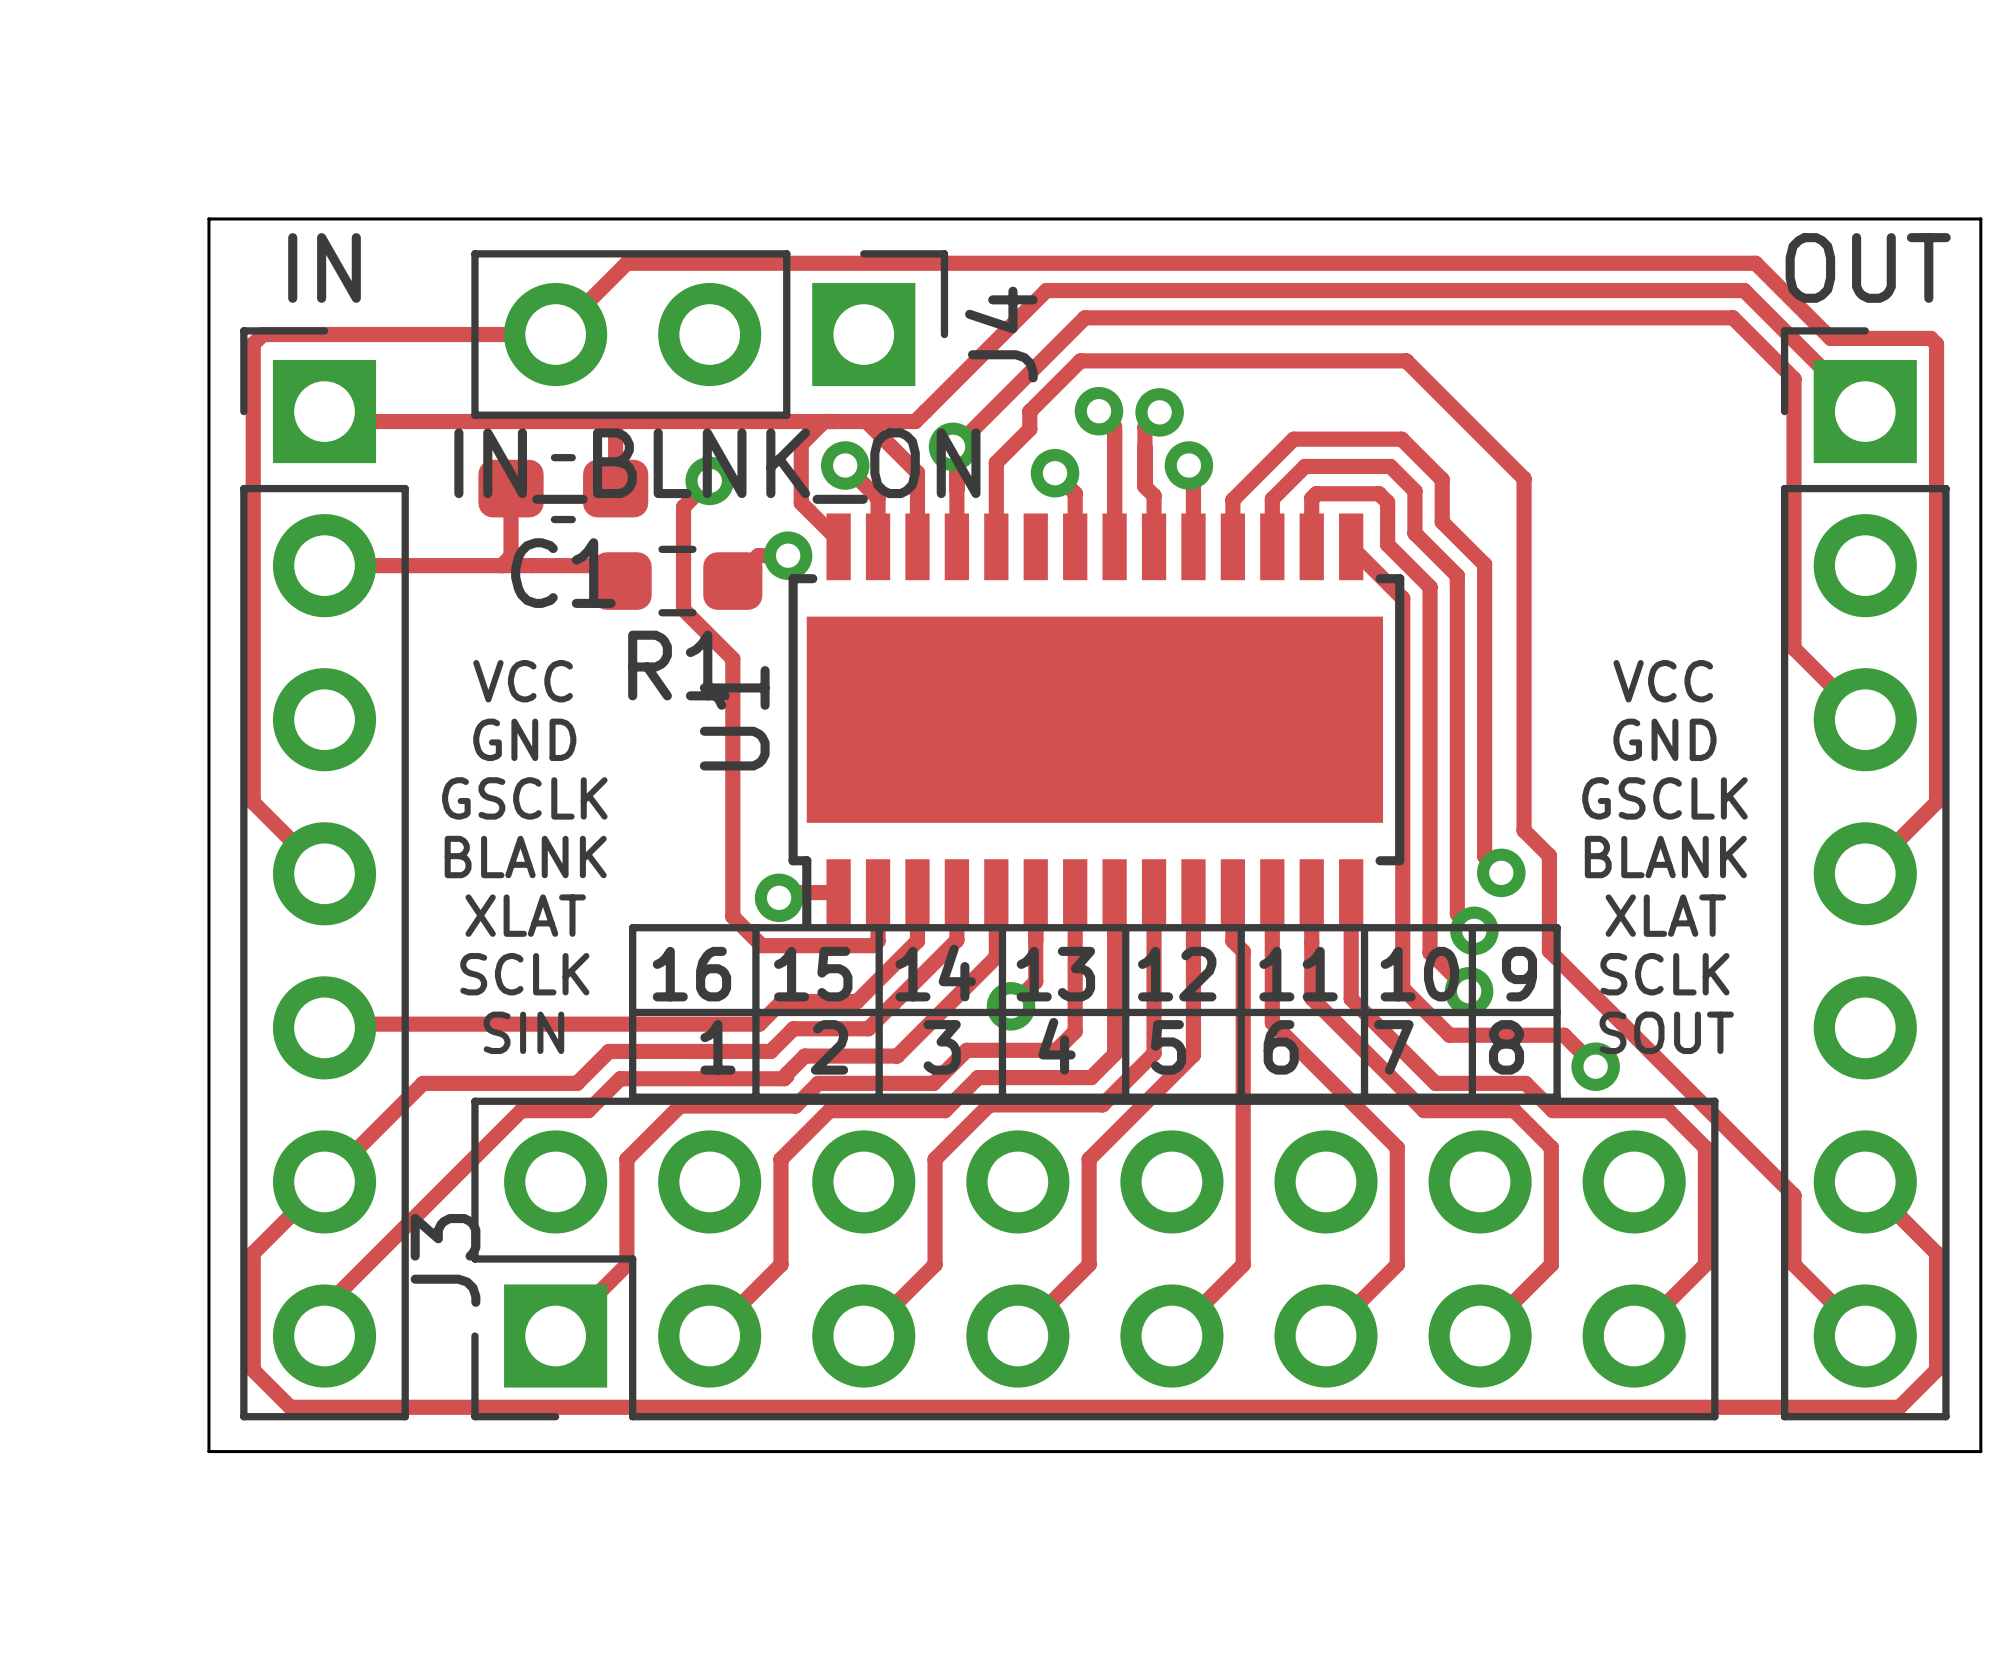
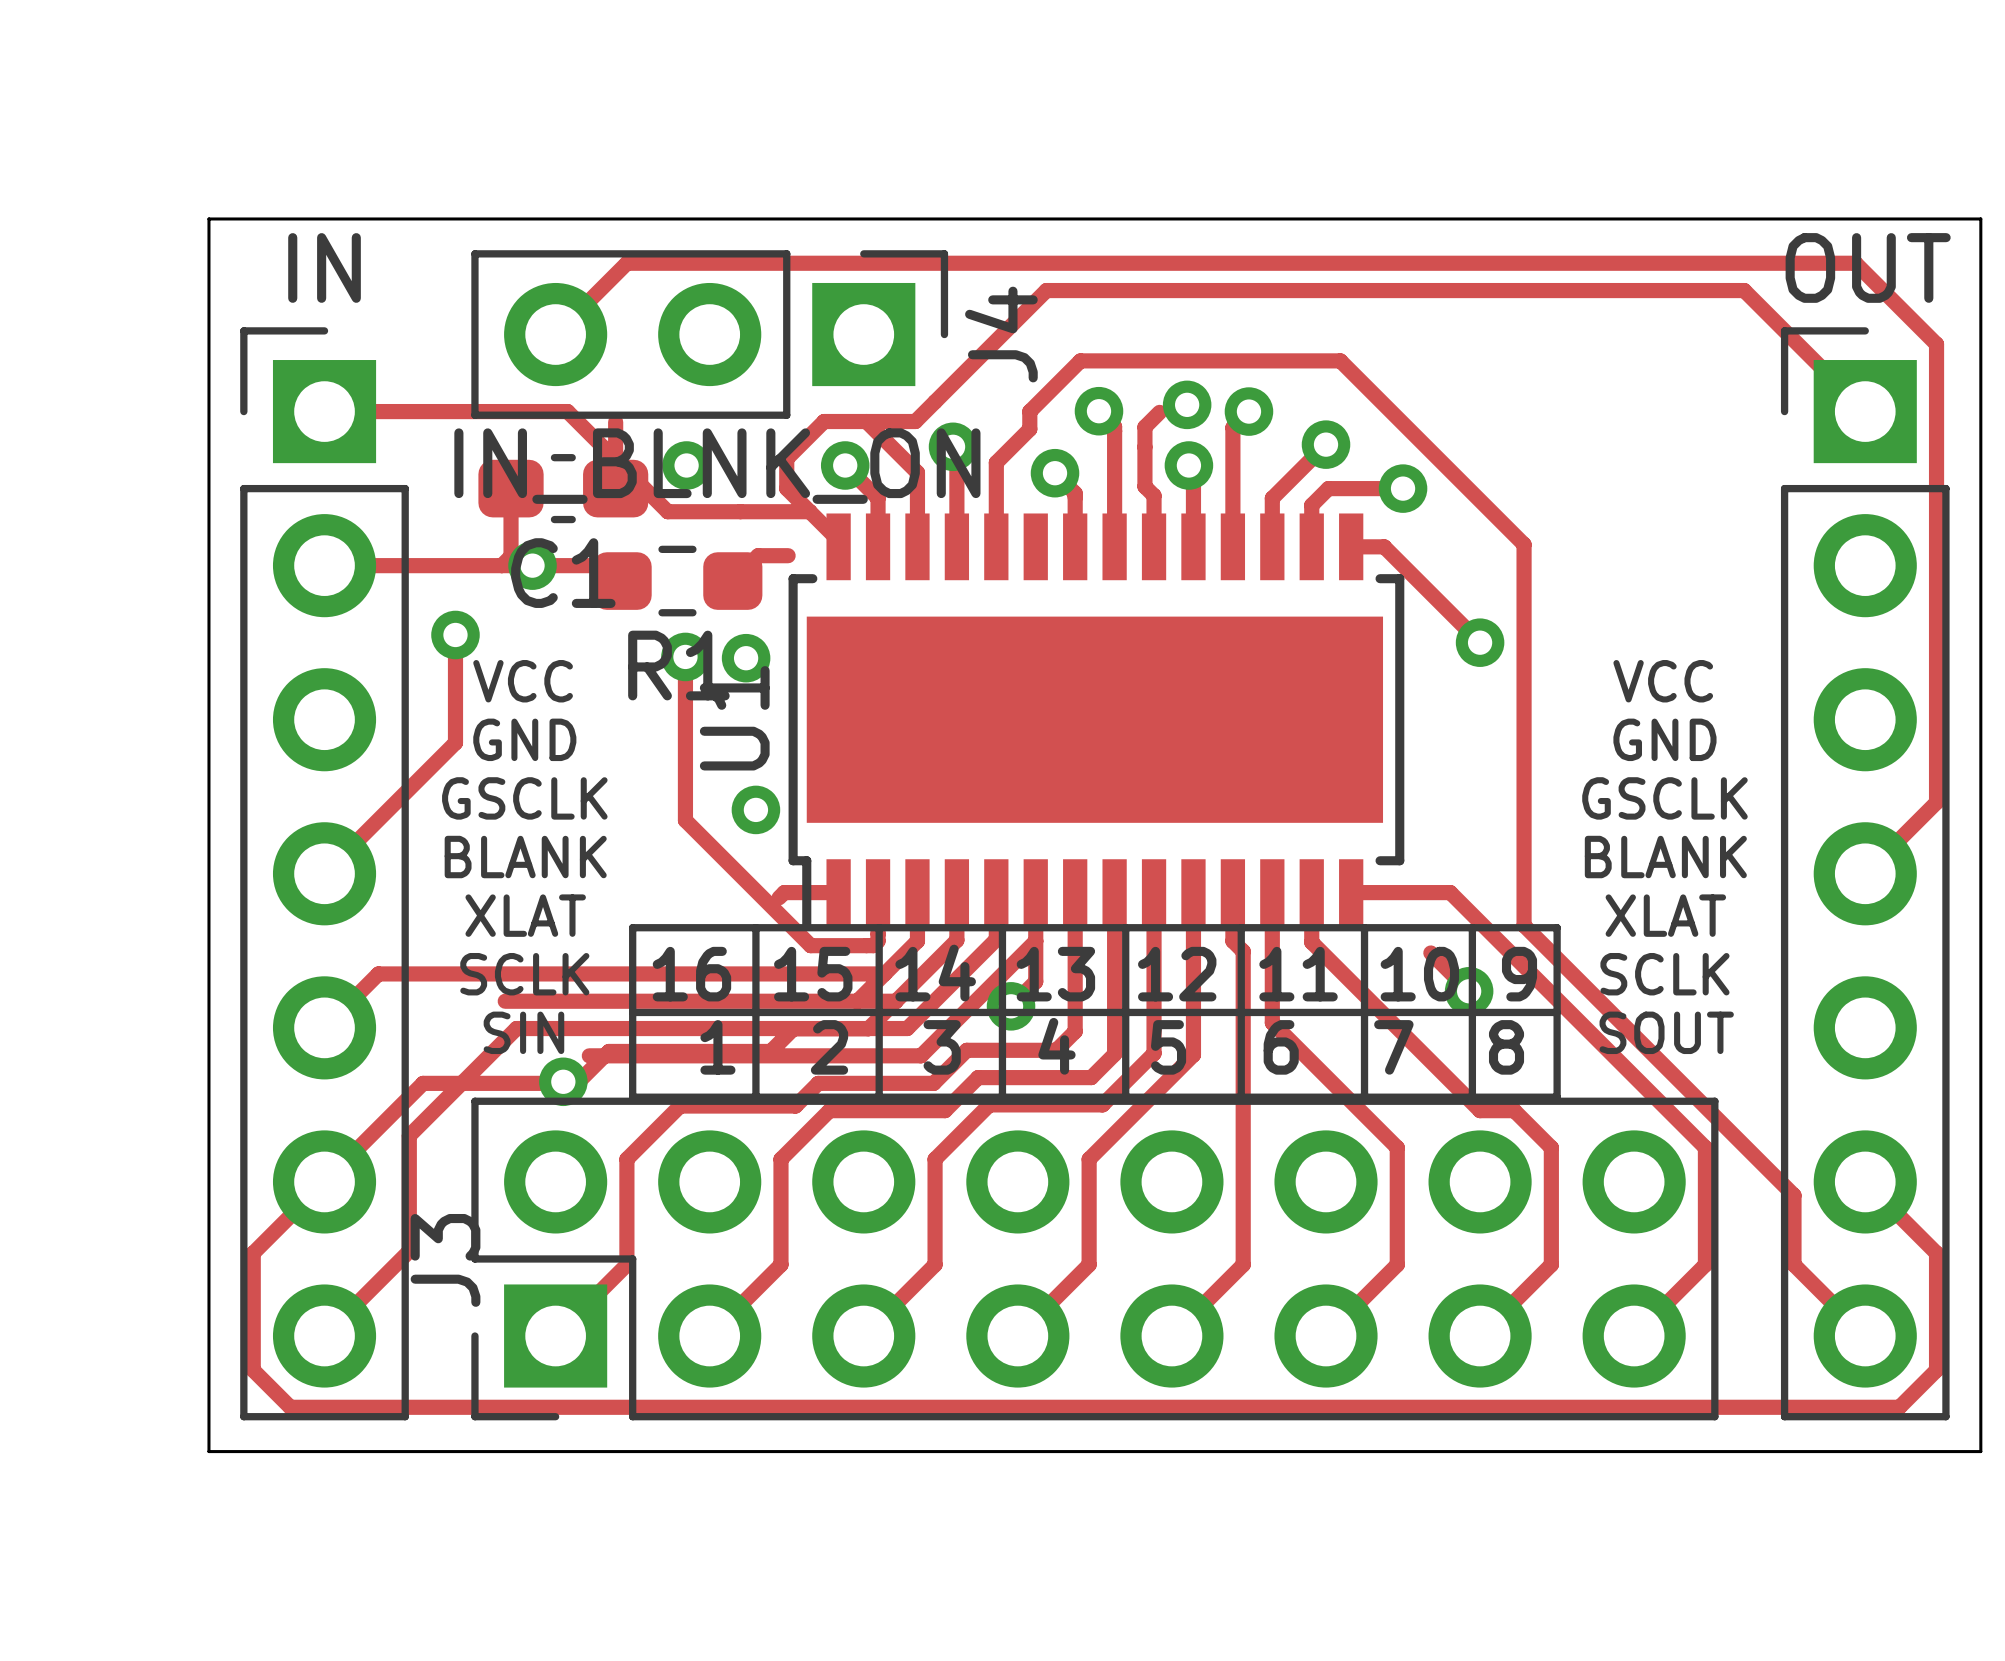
track: (1755, 263) (1830, 338) (1930, 338) -> (1755, 263) (1855, 263) (1930, 338)
track: (555, 334) (262, 334) (253, 344) (253, 802) (324, 873) -> (455, 634) (455, 742) (324, 873)
track: (1340, 360) (1406, 360) (1524, 478) (1524, 544) -> (1340, 360) (1524, 544)
track: (324, 411) (334, 421) (824, 421) -> (324, 411) (567, 411) (667, 511) (809, 511)
via: none -> (1248, 411)
via position: (1159, 412) -> (1187, 404)
track: (801, 444) (801, 503) -> (801, 444) (786, 458) (786, 488) (801, 503)
via: none -> (1326, 444)
track: (956, 458) (956, 445) (1084, 317) (1732, 317) (1793, 378) (1793, 648) (1865, 719) -> none
track: (709, 480) (683, 507) (683, 609) (732, 658) (732, 916) (761, 945) (810, 945) -> (685, 656) (685, 820) (810, 945)
via position: (709, 480) -> (686, 465)
via: none -> (1403, 488)
track: (1232, 499) (1293, 439) (1401, 439) (1442, 479) (1442, 522) (1484, 564) (1484, 856) (1501, 872) -> (1232, 499) (1232, 427) (1248, 411)
track: (1272, 499) (1304, 466) (1390, 466) (1414, 491) (1414, 533) (1457, 575) (1457, 913) (1474, 930) -> (1272, 498) (1326, 444)
track: (1311, 505) (1311, 498) (1316, 493) (1379, 493) (1387, 502) (1387, 544) (1430, 587) (1430, 952) -> (1311, 505) (1328, 488) (1403, 488)
track: (1351, 546) (1402, 598) (1402, 988) (1449, 1035) (1564, 1035) (1595, 1066) -> (1351, 546) (1384, 546) (1480, 642)
via: (788, 555) -> none
via: none -> (532, 565)
via: none -> (455, 634)
via: none -> (1480, 642)
via: none -> (685, 656)
via: none -> (746, 658)
track: (1524, 830) (1549, 855) (1549, 950) -> (1524, 830) (1524, 925) (1549, 950)
via: (1501, 872) -> none
track: (1351, 892) (1351, 999) (1435, 1083) (1525, 1083) (1552, 1110) (1668, 1110) -> (1351, 892) (1450, 892) (1668, 1110)
via position: (779, 897) -> (755, 809)
via: (1474, 930) -> none
track: (996, 939) (996, 956) (897, 1056) -> (1035, 941) (921, 1055) (897, 1056)
track: (1311, 942) (1311, 998) (1424, 1110) (1480, 1110) -> (1311, 942) (1480, 1110)
track: (782, 1001) (759, 1024) (328, 1024) -> (884, 973) (378, 973) (328, 1024)
track: (804, 1056) (784, 1078) (620, 1078) (588, 1110) (521, 1110) (324, 1307) (324, 1336) -> (996, 939) (907, 1028) (516, 1028) (409, 1135) (409, 1251) (324, 1336)
via: (1595, 1066) -> none
via: none -> (563, 1081)

